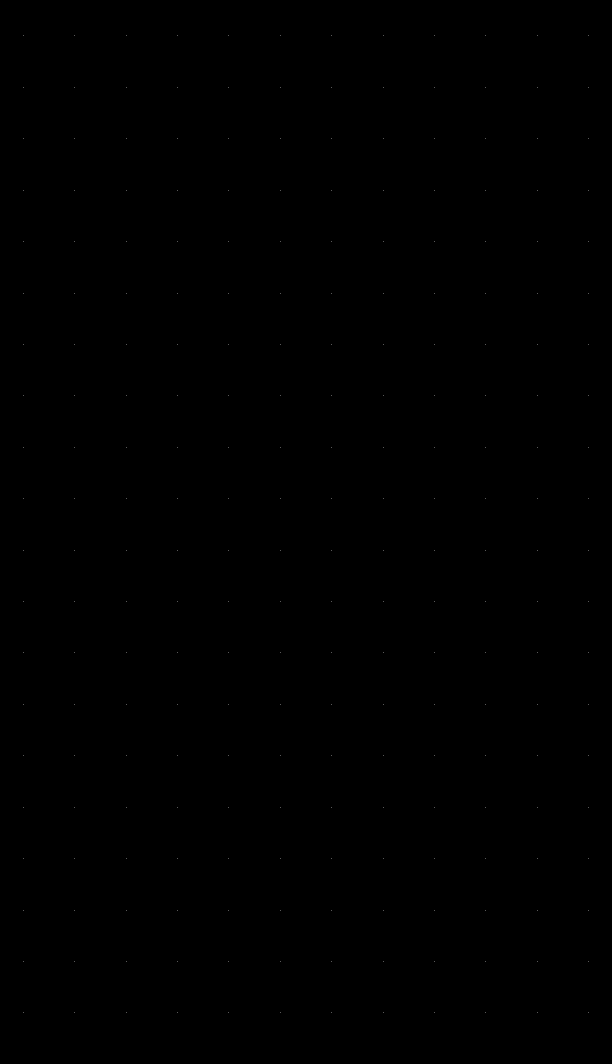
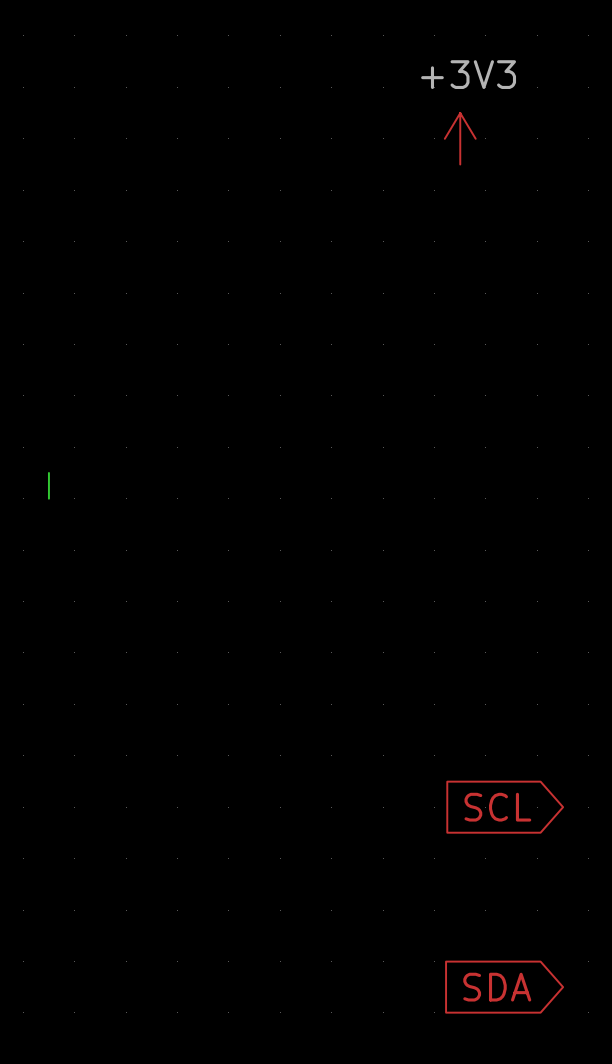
power symbol: none -> +3V3 (460, 138)
wire: none -> (48, 472) (48, 498)
global label: none -> SCL (497, 807)
global label: none -> SDA (497, 987)

